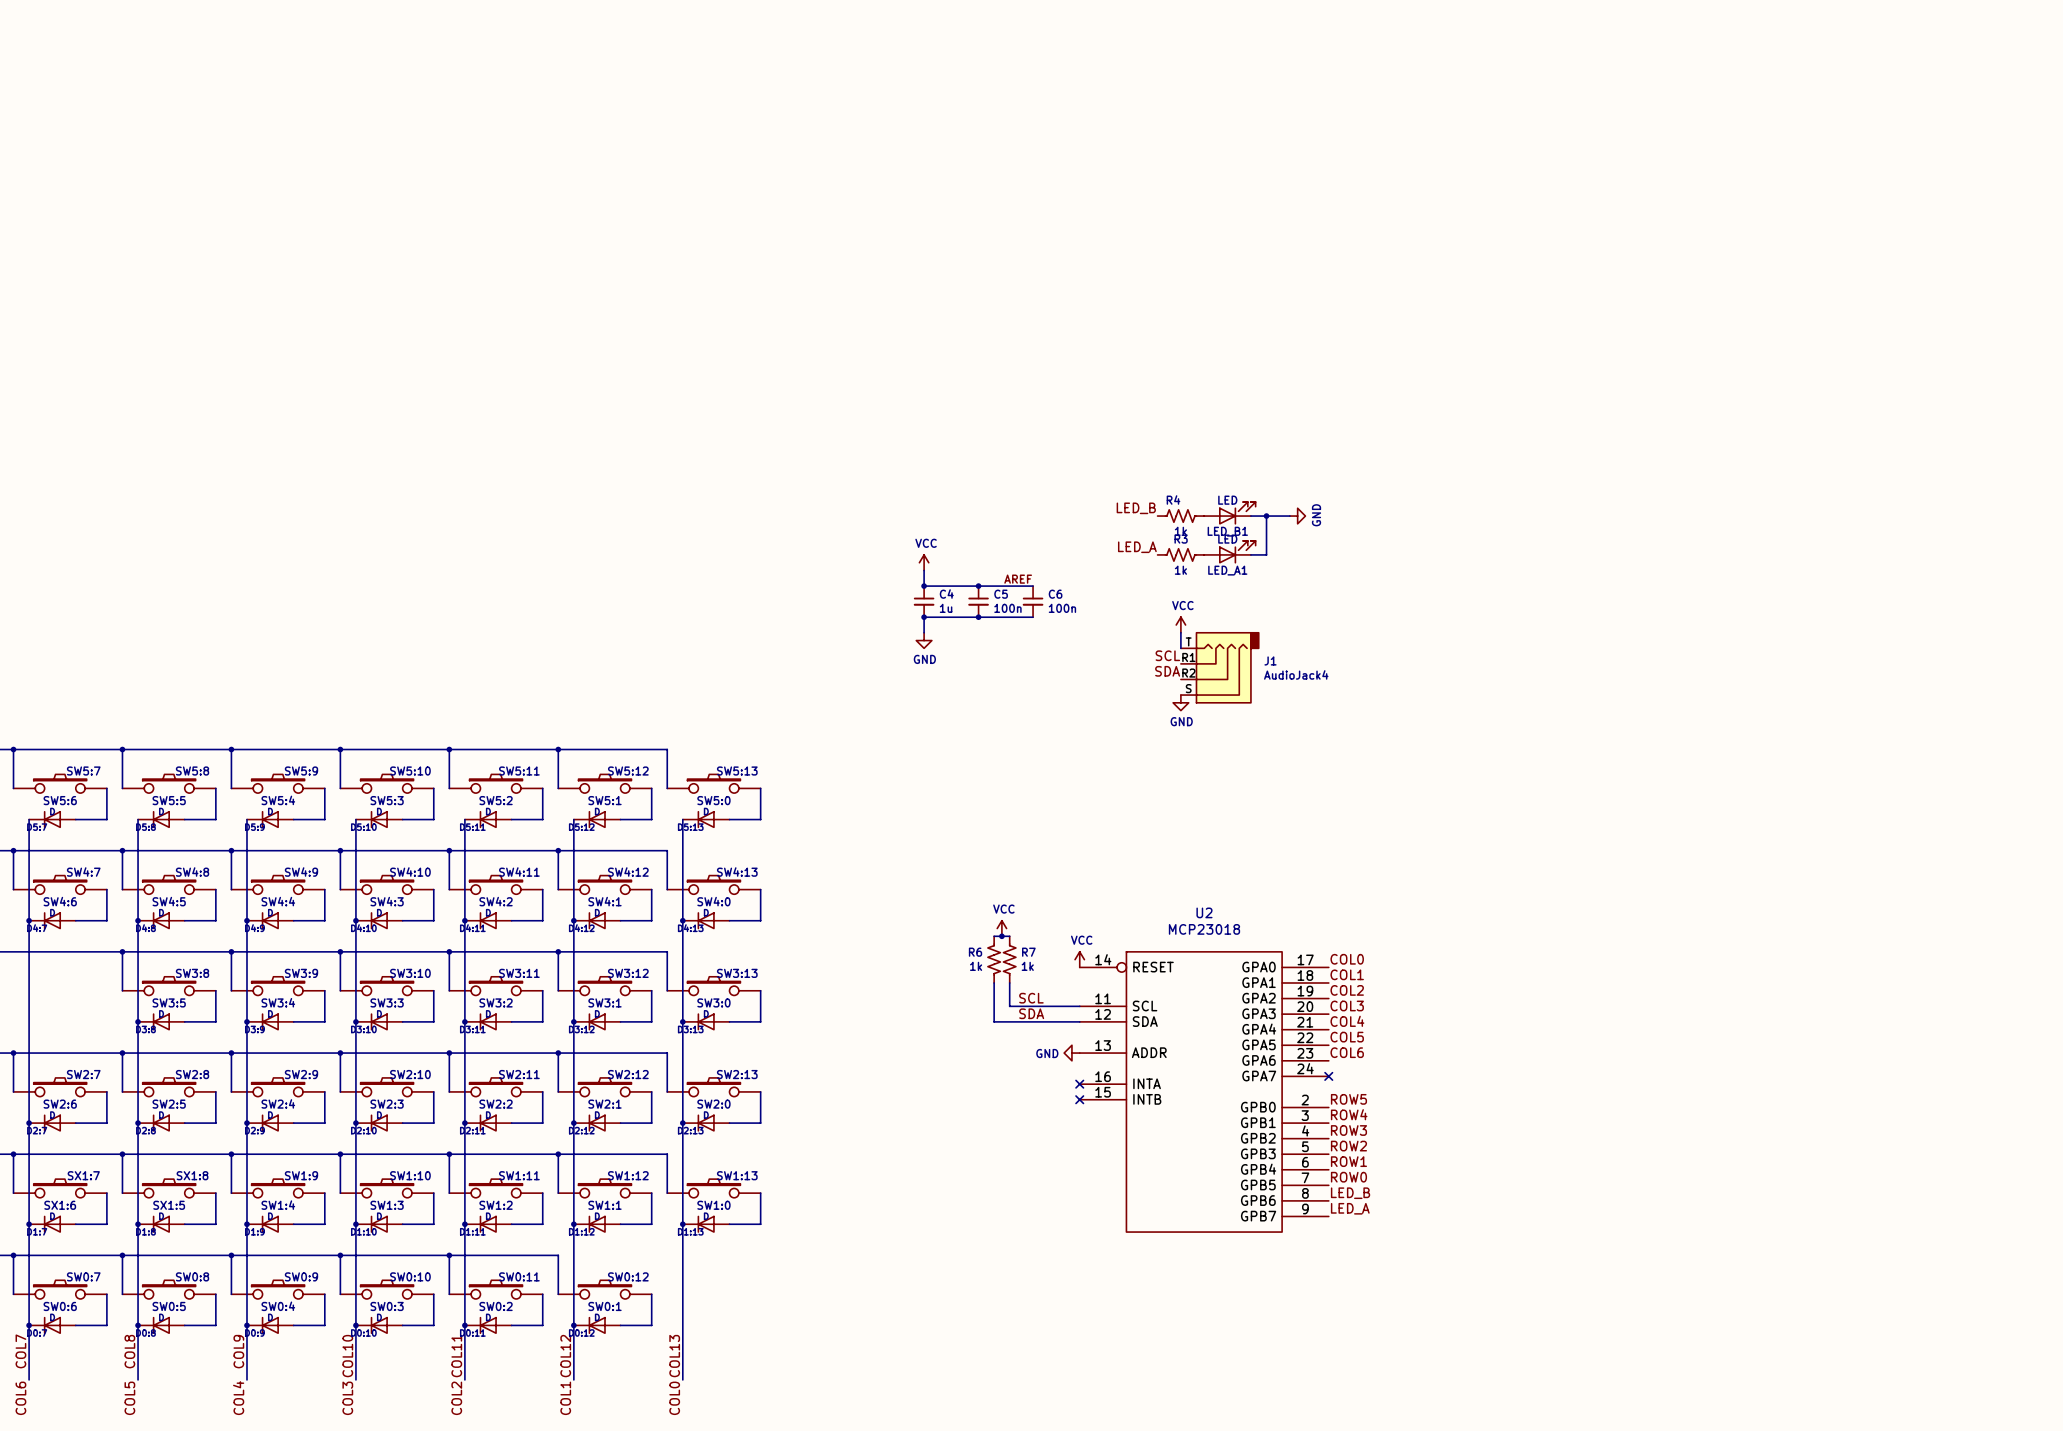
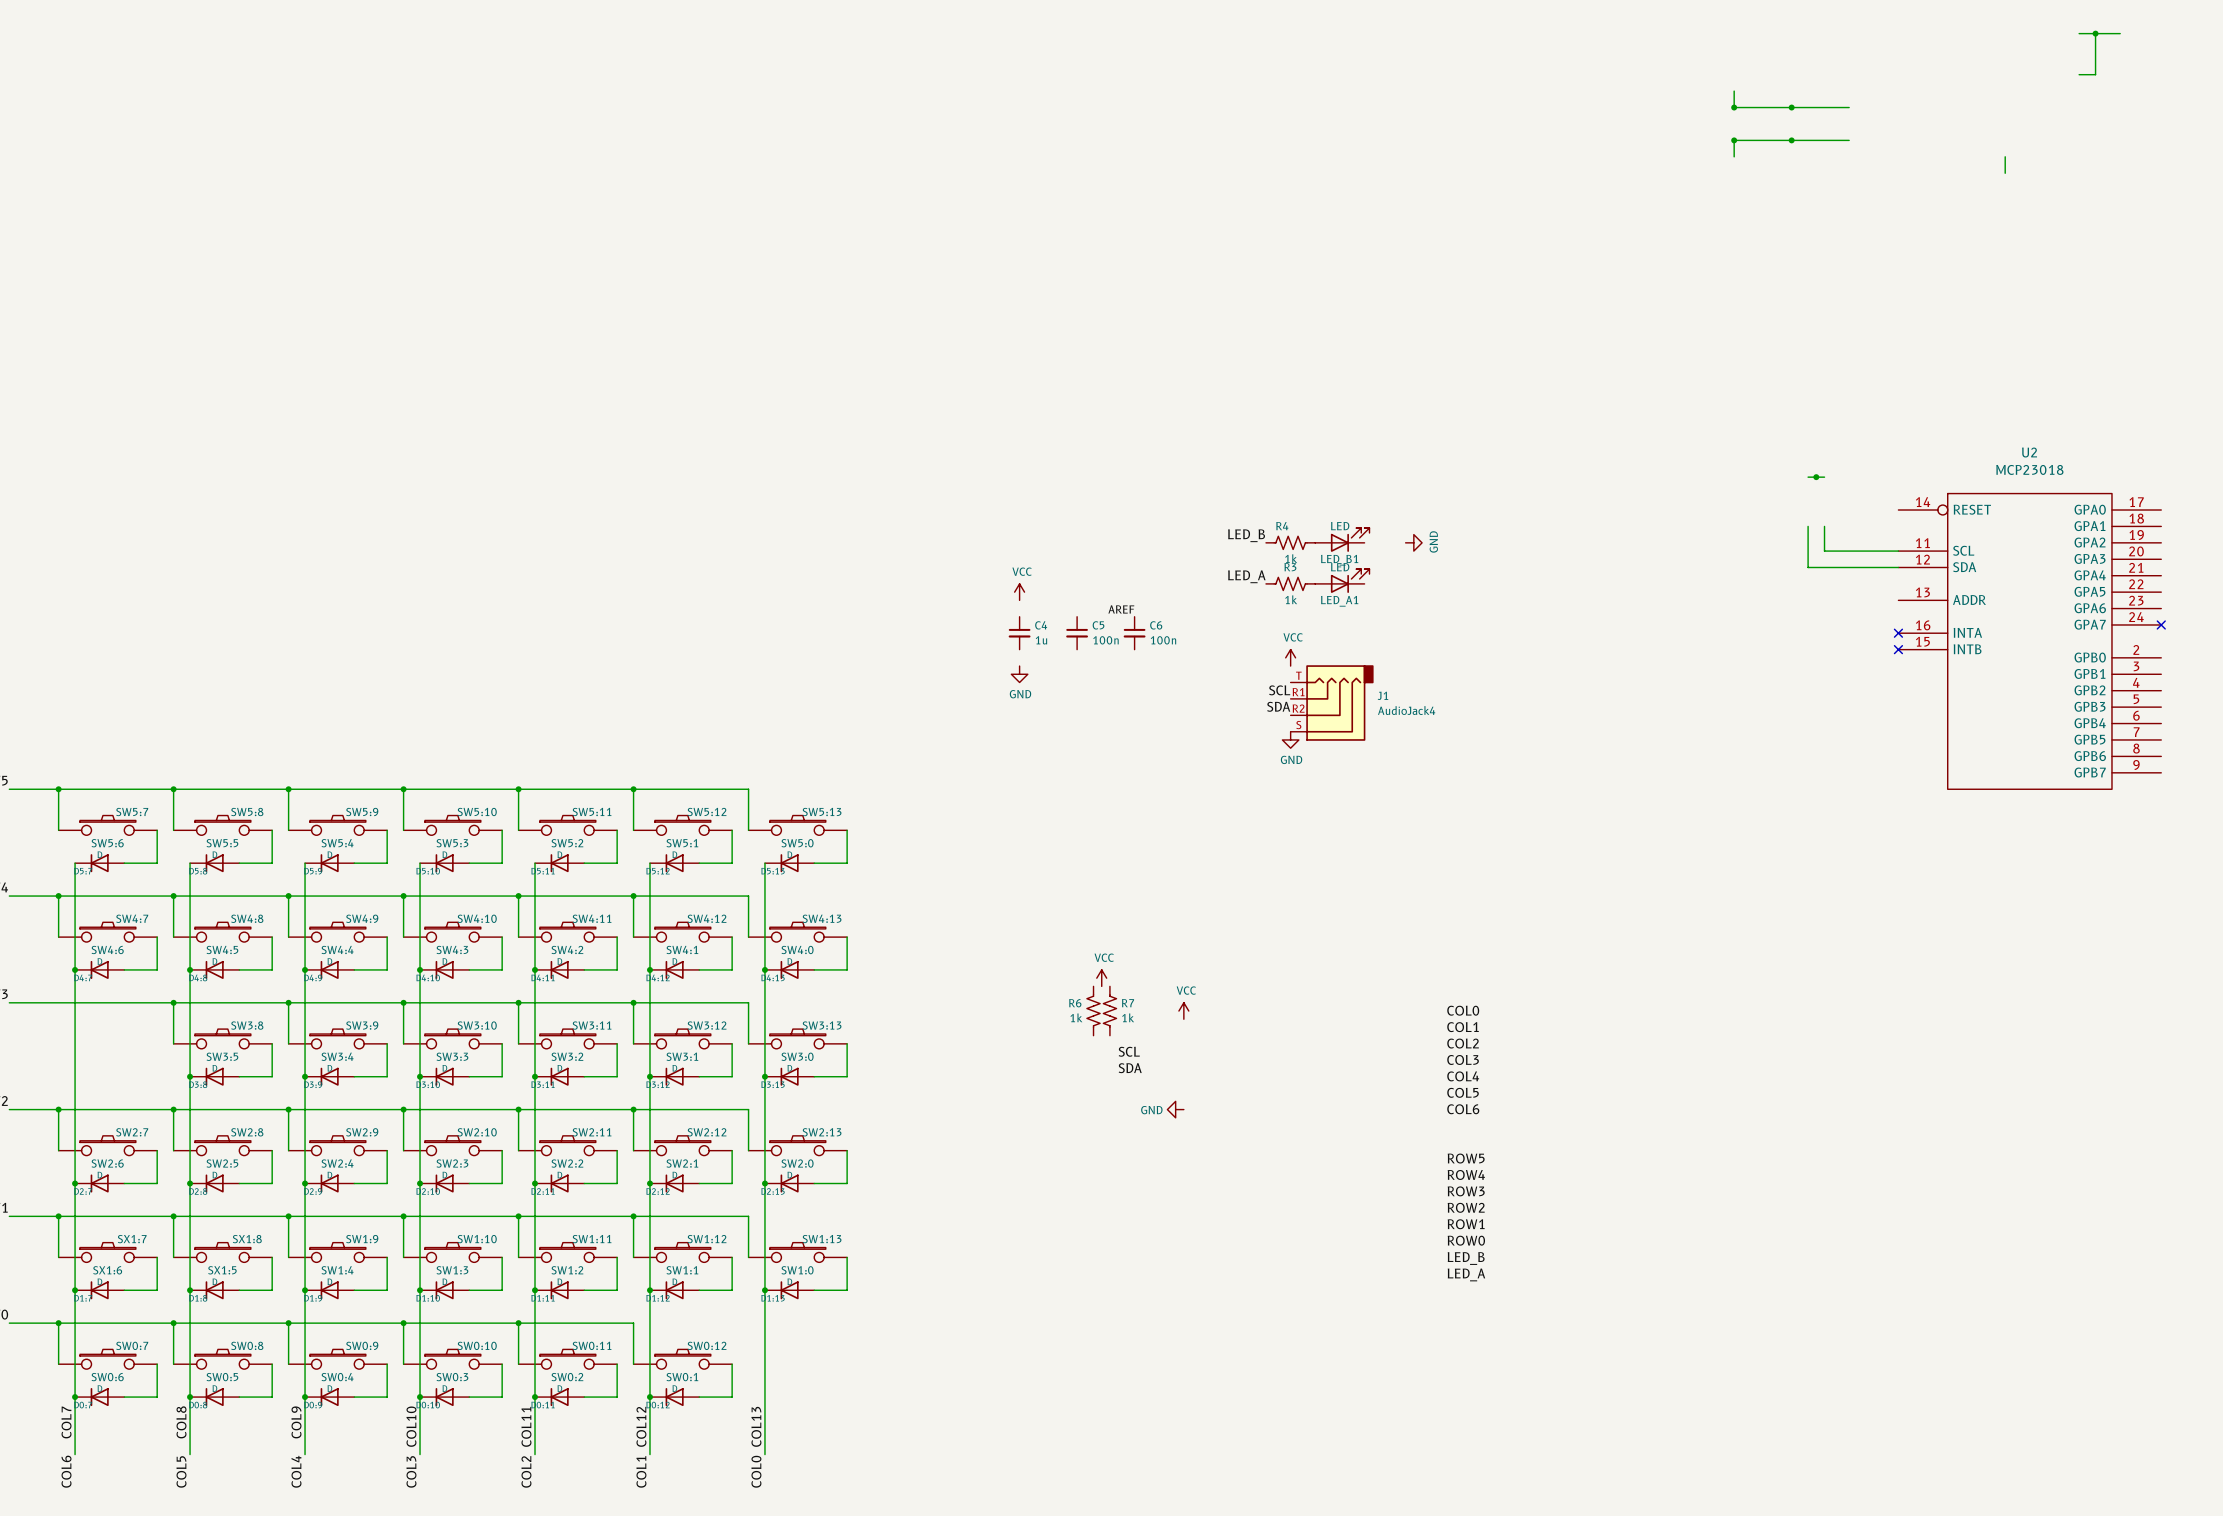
wire: none -> (2079, 33) (2120, 33)
wire: none -> (2095, 33) (2095, 74) (2079, 74)
junction: none -> (2095, 33)
wire: none -> (1734, 91) (1734, 107) (1849, 107)
junction: none -> (1734, 107)
junction: none -> (1791, 107)
junction: none -> (1734, 140)
junction: none -> (1791, 140)
wire: none -> (1849, 140) (1734, 140) (1734, 156)
wire: none -> (2005, 156) (2005, 173)
wire: none -> (1808, 477) (1824, 477)
junction: none -> (1816, 477)
wire: none -> (1808, 526) (1808, 567) (1898, 567)
wire: none -> (1824, 526) (1824, 551) (1898, 551)
wire: (1250, 516) (1289, 516) -> none
wire: (1266, 516) (1266, 554) (1250, 554) -> none
junction: (1266, 516) -> none
wire: (924, 570) (924, 586) (1033, 586) -> none
junction: (924, 586) -> none
junction: (978, 586) -> none
no-connect mark: none -> (2161, 624)
no-connect mark: none -> (1898, 633)
junction: (924, 617) -> none
junction: (978, 617) -> none
wire: (1033, 617) (924, 617) (924, 632) -> none
no-connect mark: none -> (1898, 649)
wire: (1180, 632) (1180, 648) -> none
wire: (994, 936) (1009, 936) -> none
junction: (1001, 936) -> none
wire: (994, 982) (994, 1021) (1079, 1021) -> none
wire: (1009, 982) (1009, 1006) (1079, 1006) -> none
no-connect mark: (1328, 1076) -> none
no-connect mark: (1079, 1084) -> none
U2 position: (1204, 1091) -> (2029, 641)
no-connect mark: (1079, 1099) -> none

